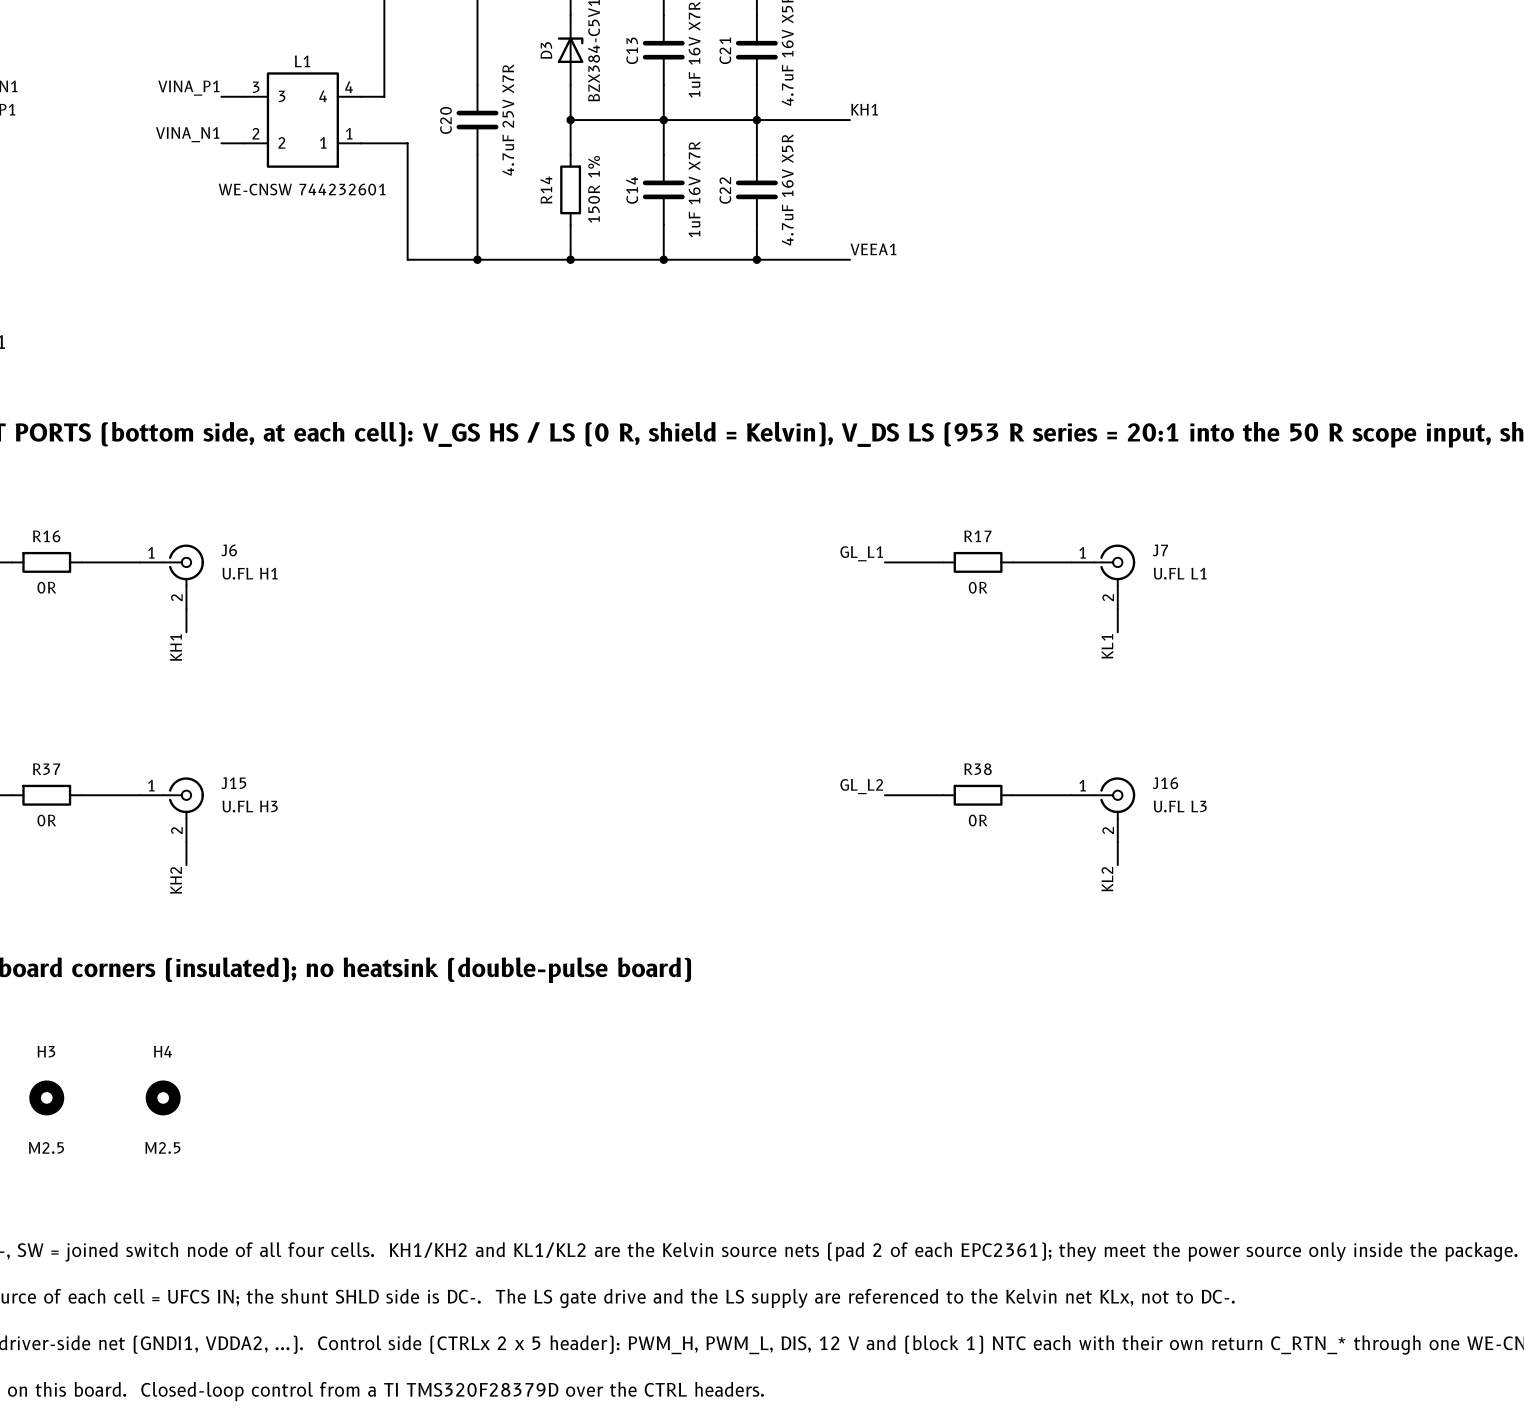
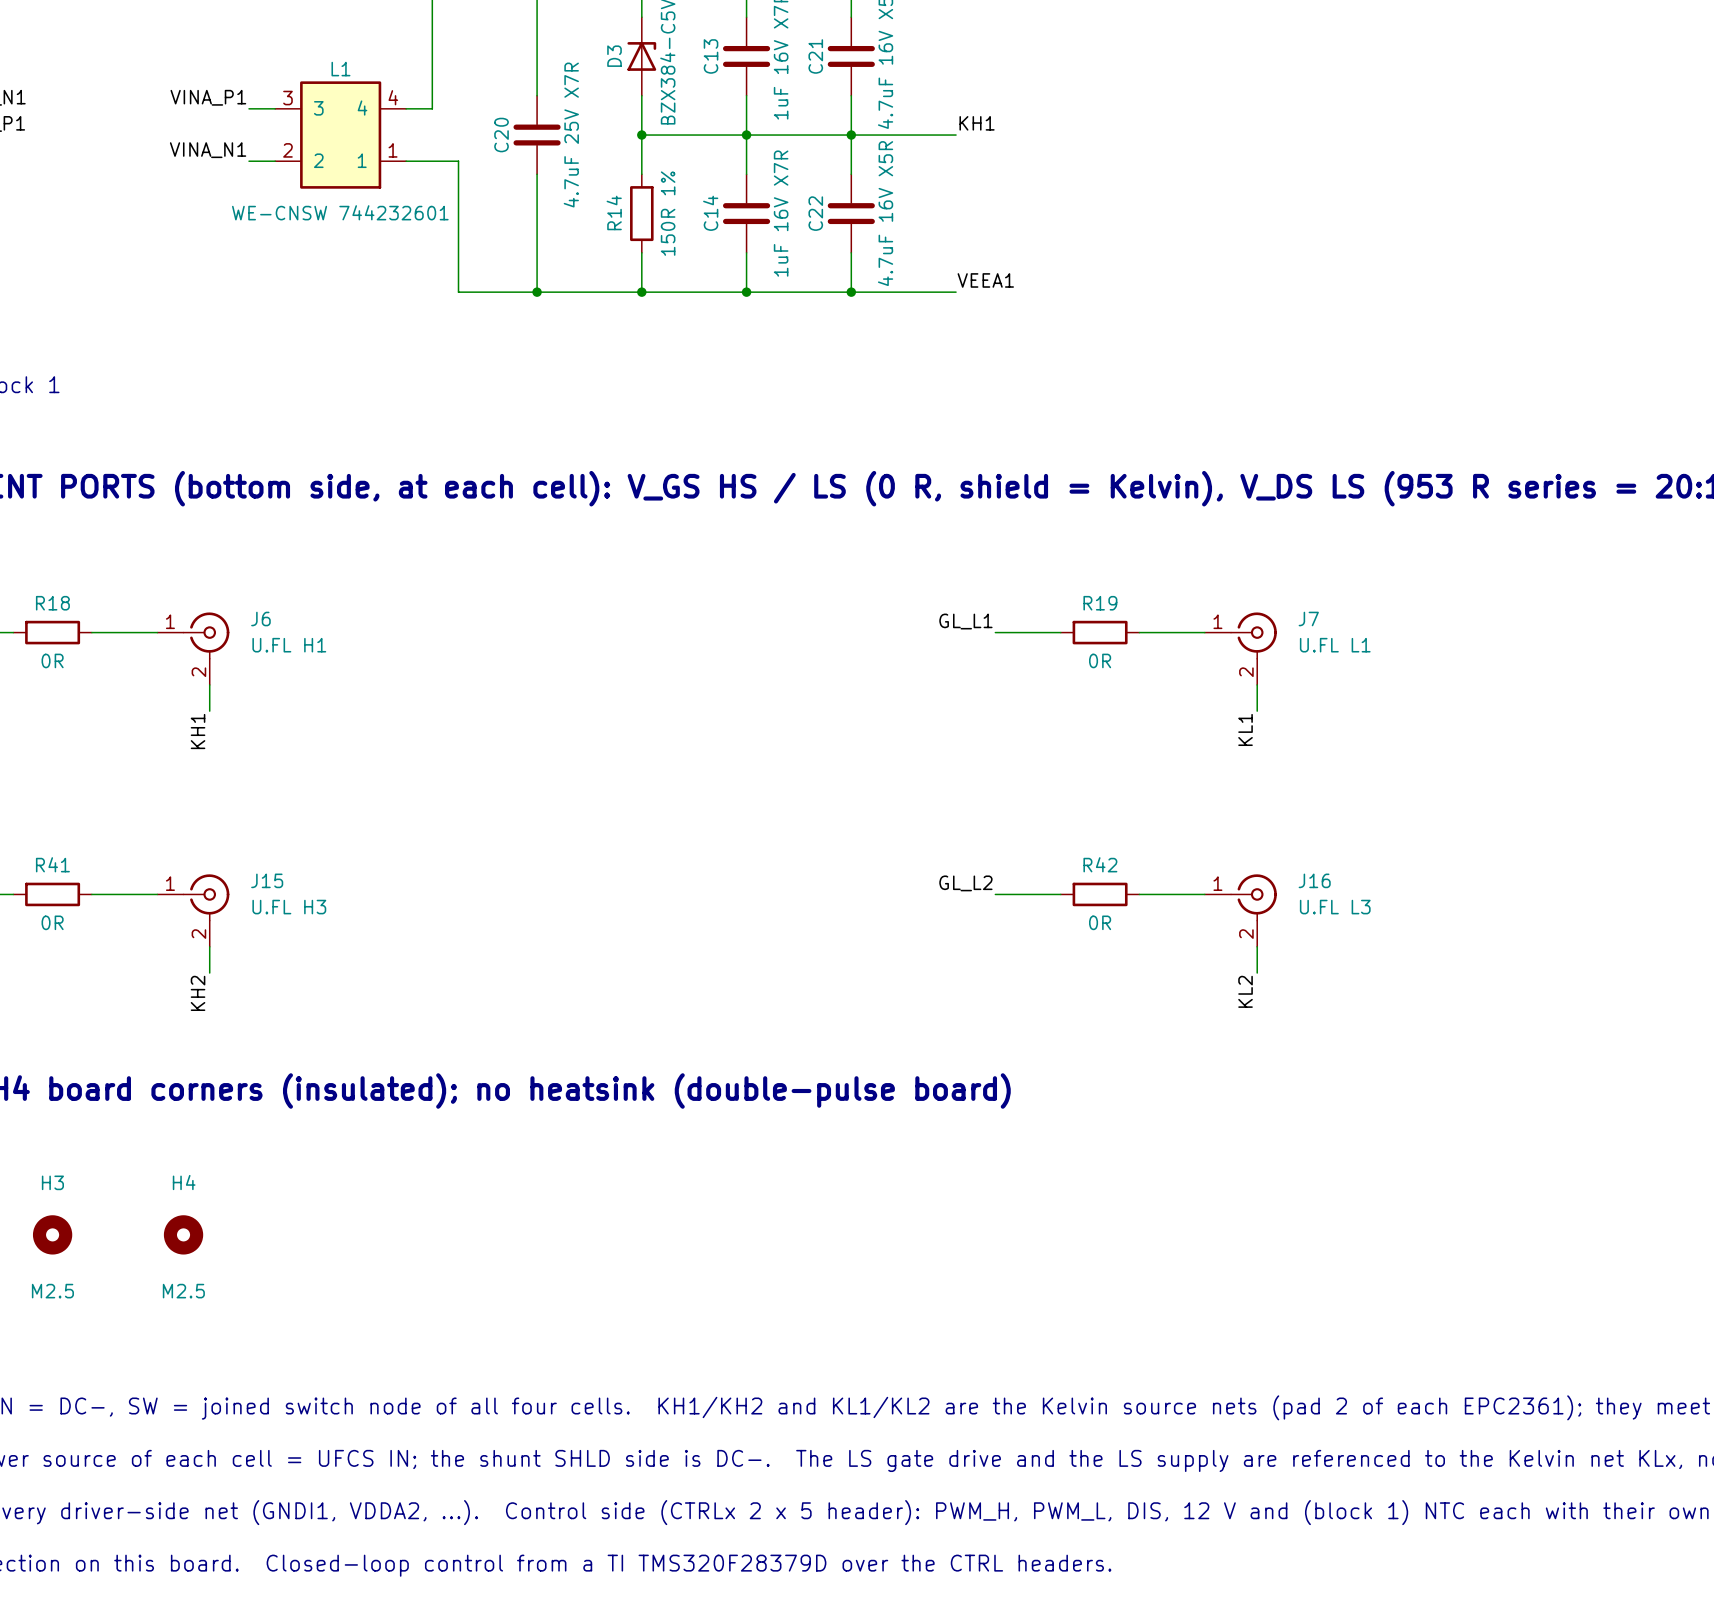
R16 name: R16 (46, 536) -> R18 (52, 603)
R17 name: R17 (977, 536) -> R19 (1100, 603)
R37 name: R37 (46, 769) -> R41 (52, 864)
R38 name: R38 (978, 769) -> R42 (1100, 864)

